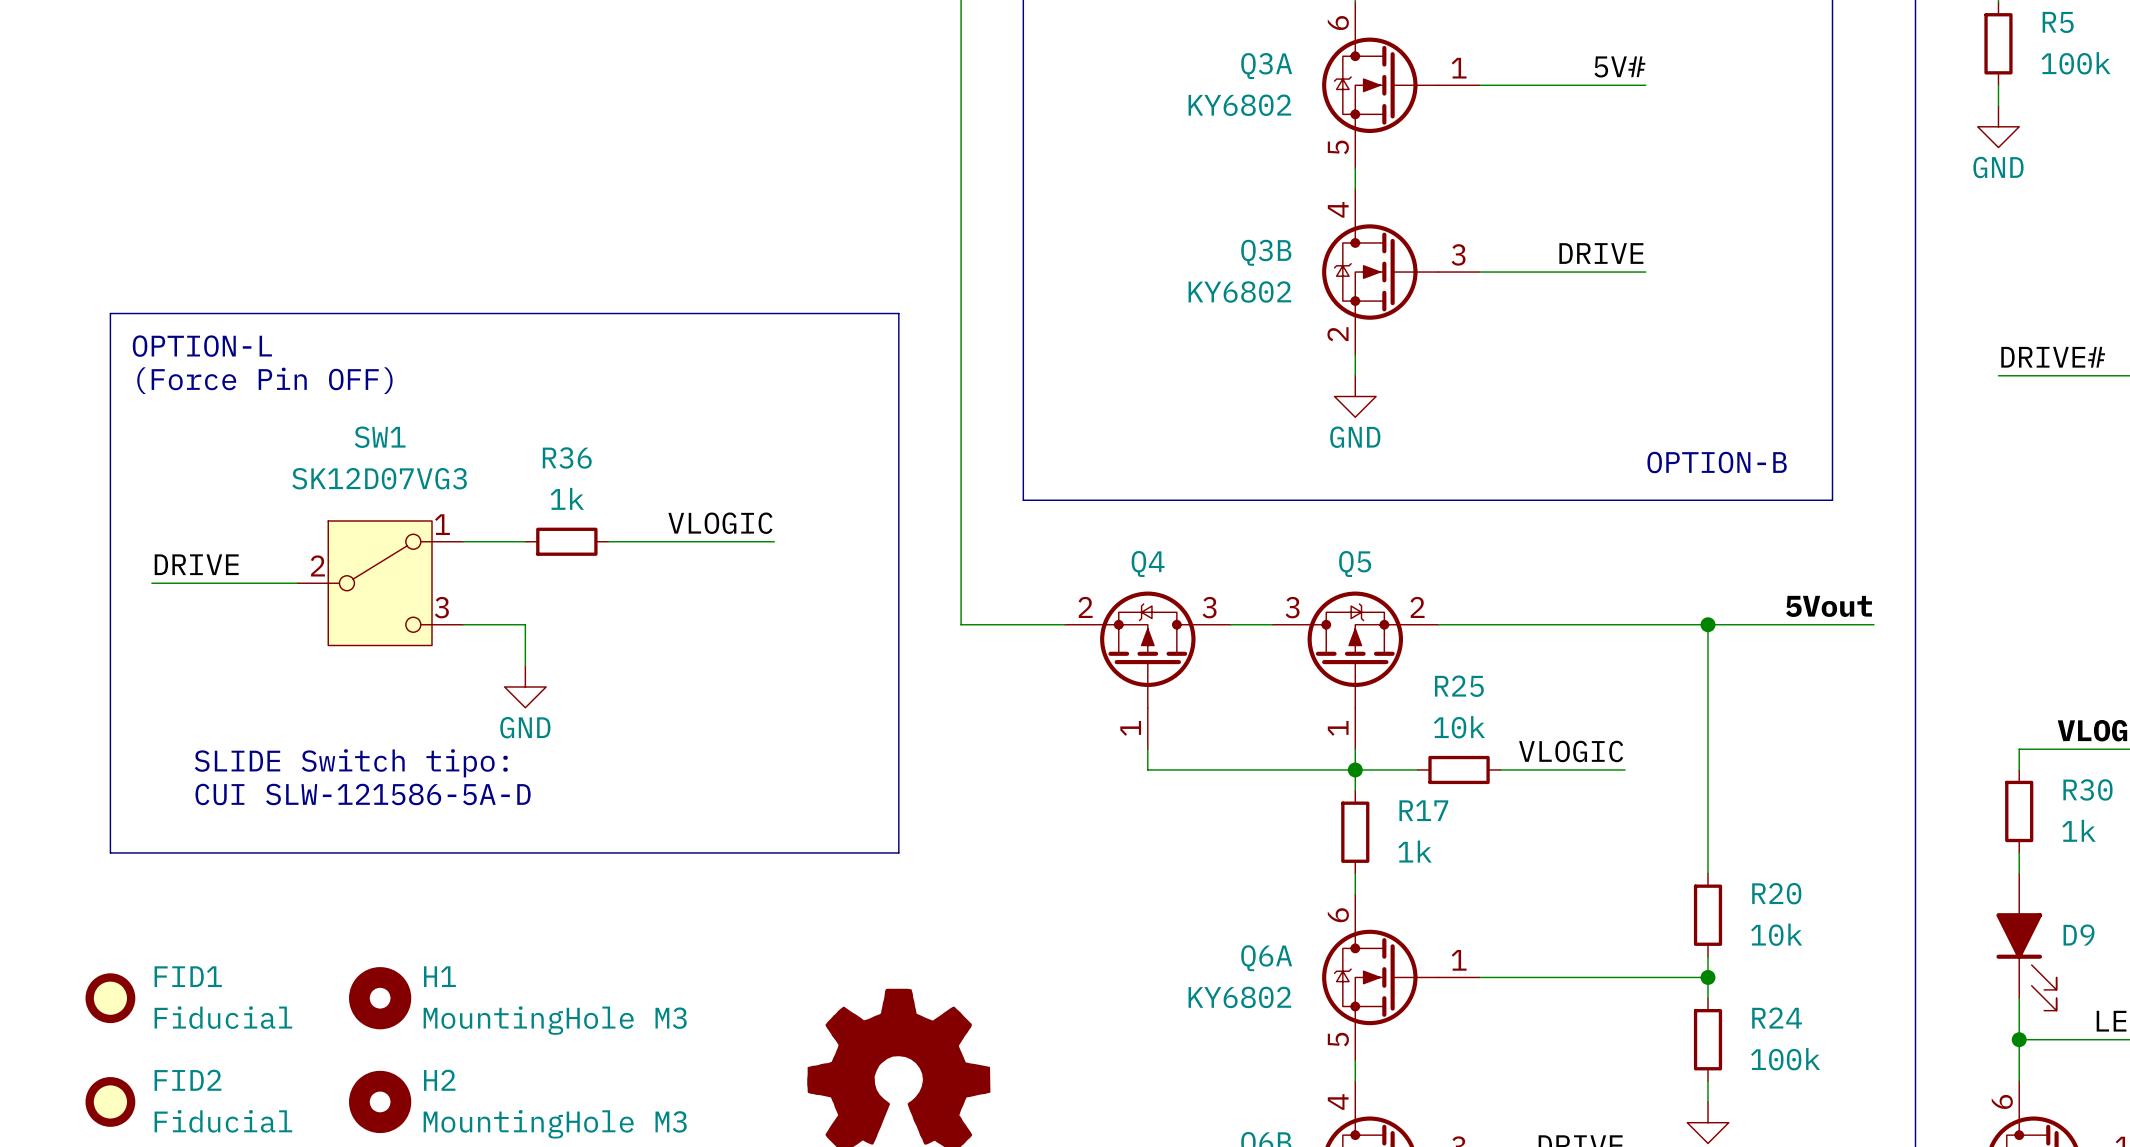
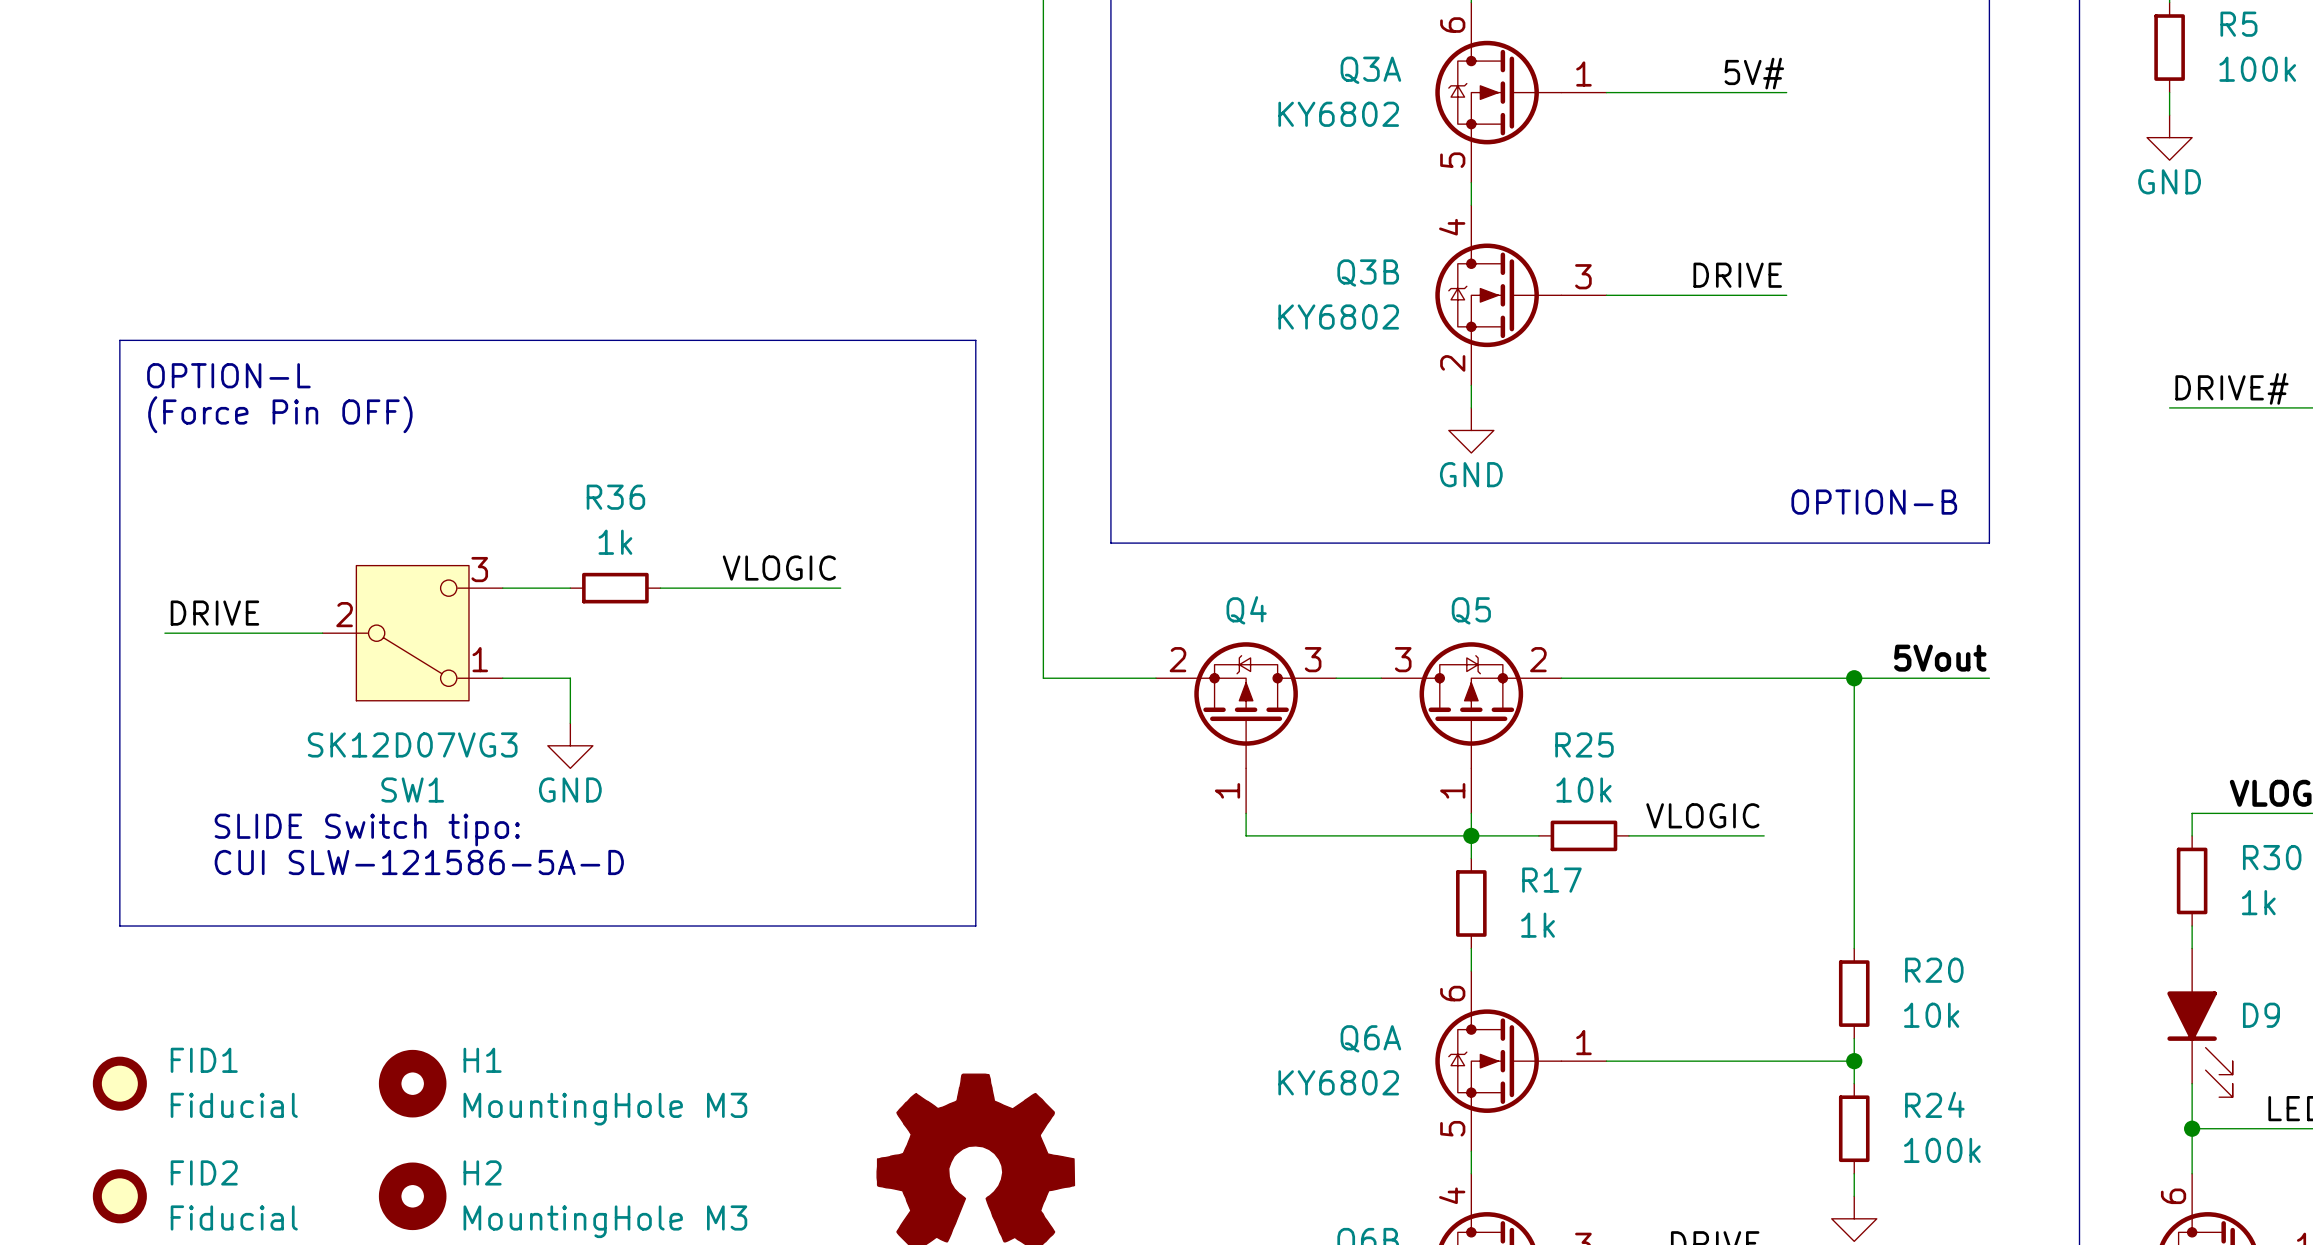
SW1 flip: as is (380, 583) -> up-down (412, 633)
label position: 5Vout (1829, 606) -> 5Vout (1940, 658)
wire: (1832, 624) (1873, 624) -> none

